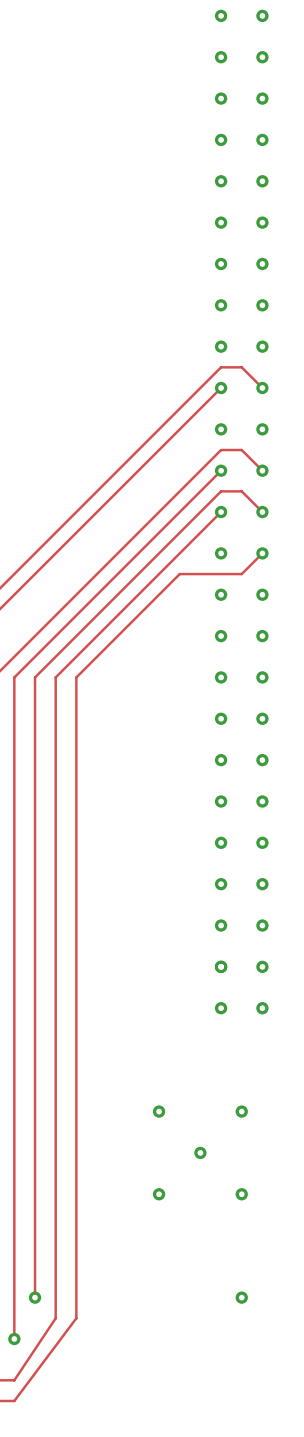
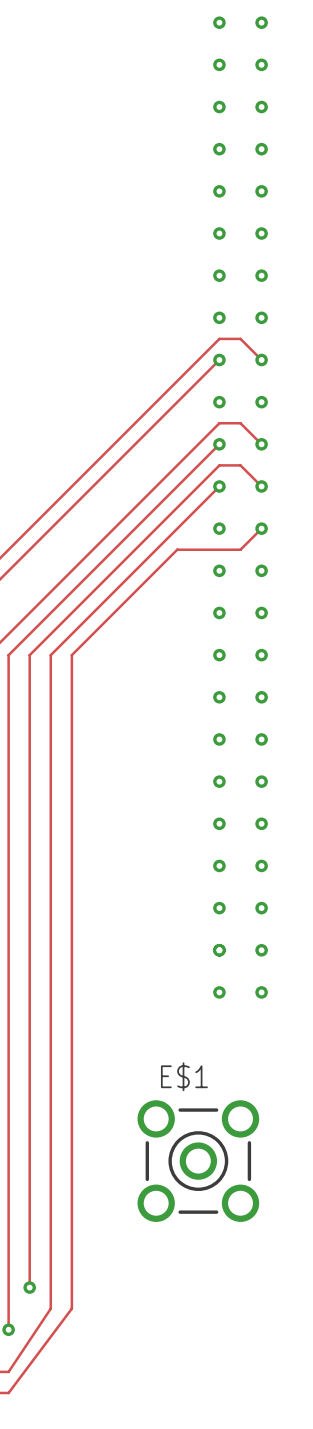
via: (159, 1111) -> none
via: (241, 1111) -> none
via: (200, 1152) -> none
E$1: none -> (198, 1161)
via: (159, 1194) -> none
via: (241, 1194) -> none
via: (241, 1297) -> none

